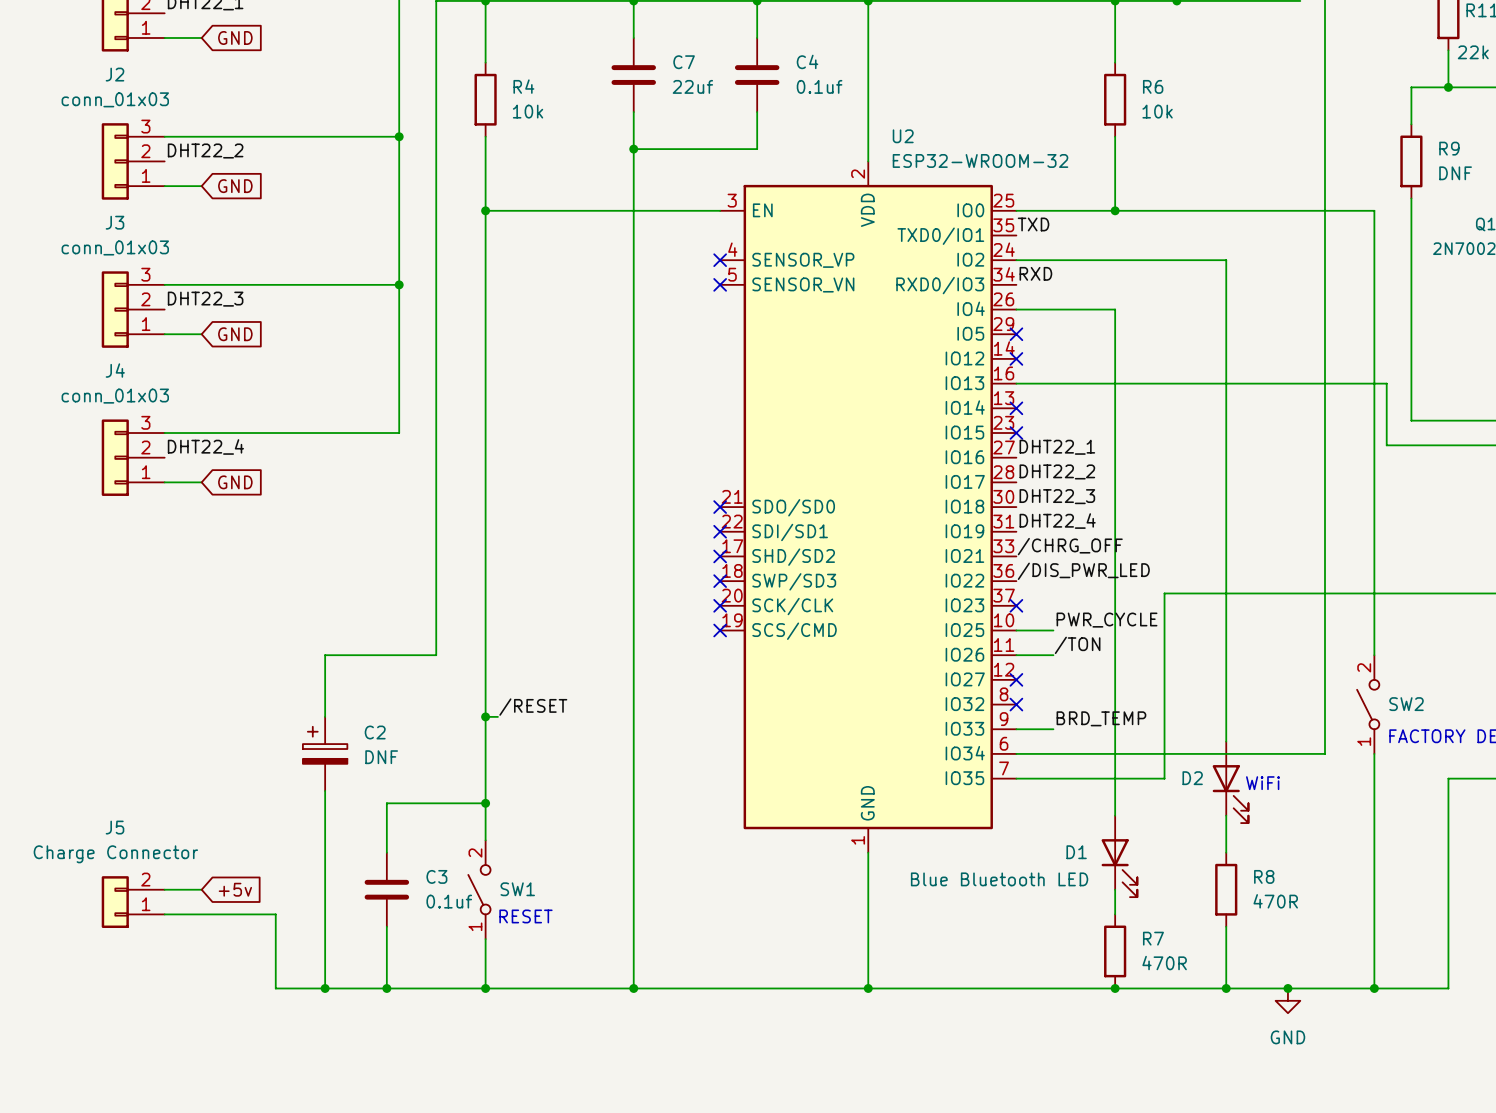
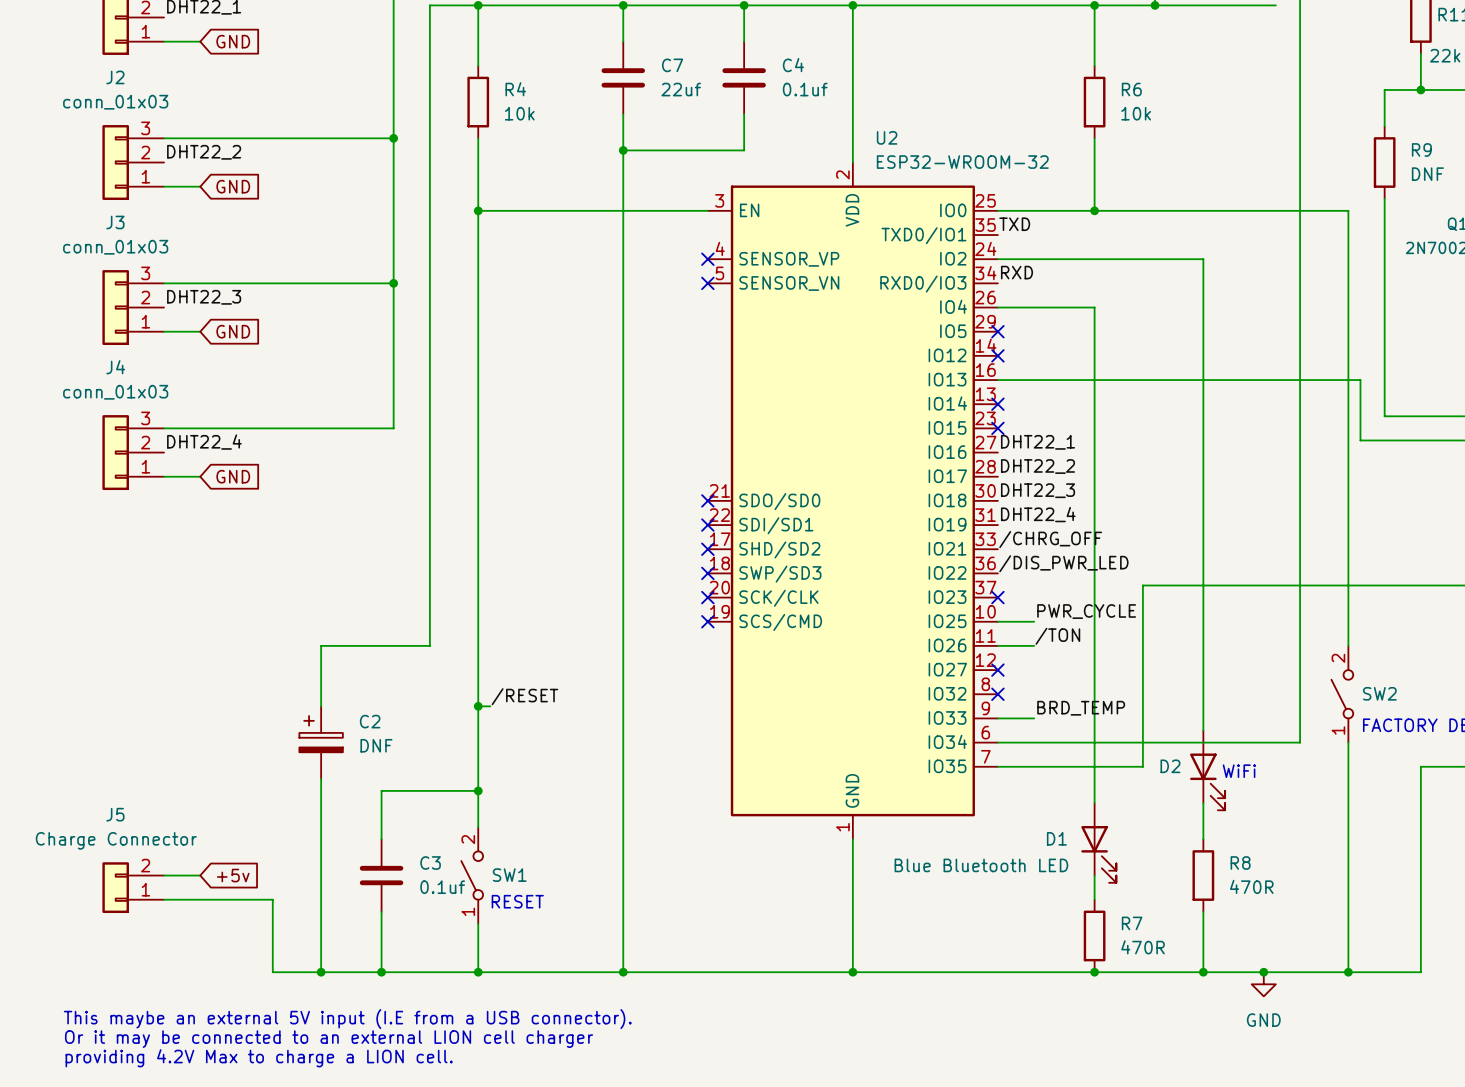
text: none -> This maybe an external 5V input (I.E from a USB connector). (347, 1019)
text: none -> Or it may be connected to an external LION cell charger (329, 1039)
text: none -> providing 4.2V Max to charge a LION cell. (259, 1058)

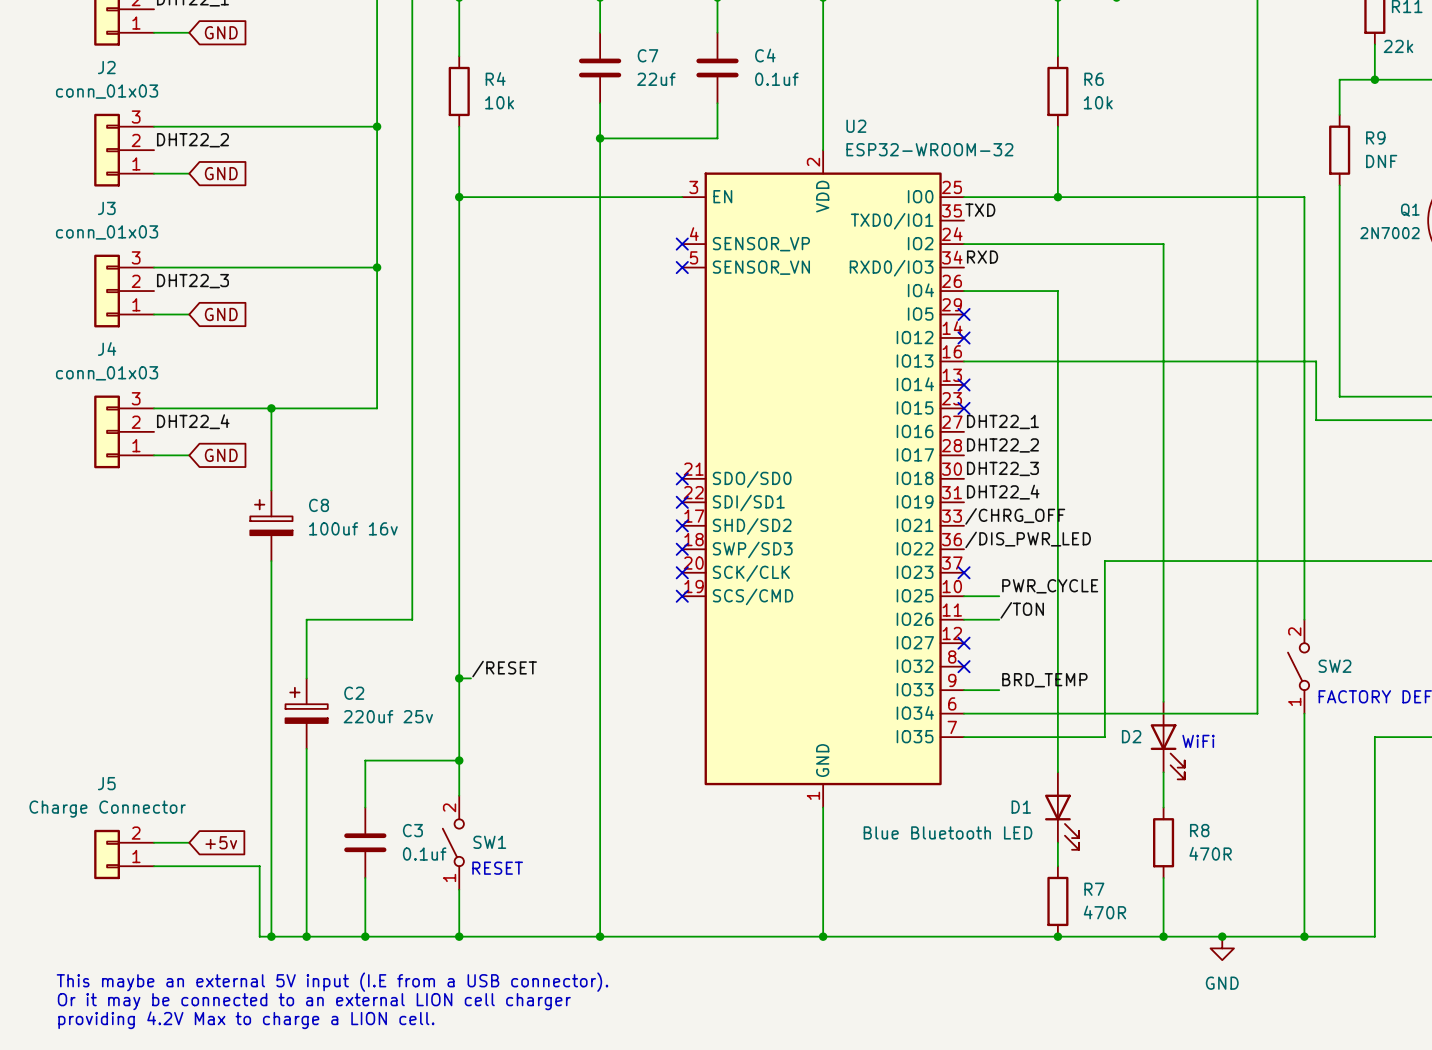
wire: none -> (271, 408) (271, 490)
junction: none -> (271, 408)
C8: none -> 100uf 16v (271, 525)
wire: none -> (271, 561) (271, 936)
C2 value: DNF (376, 745) -> 220uf 25v (388, 716)
junction: none -> (271, 936)

